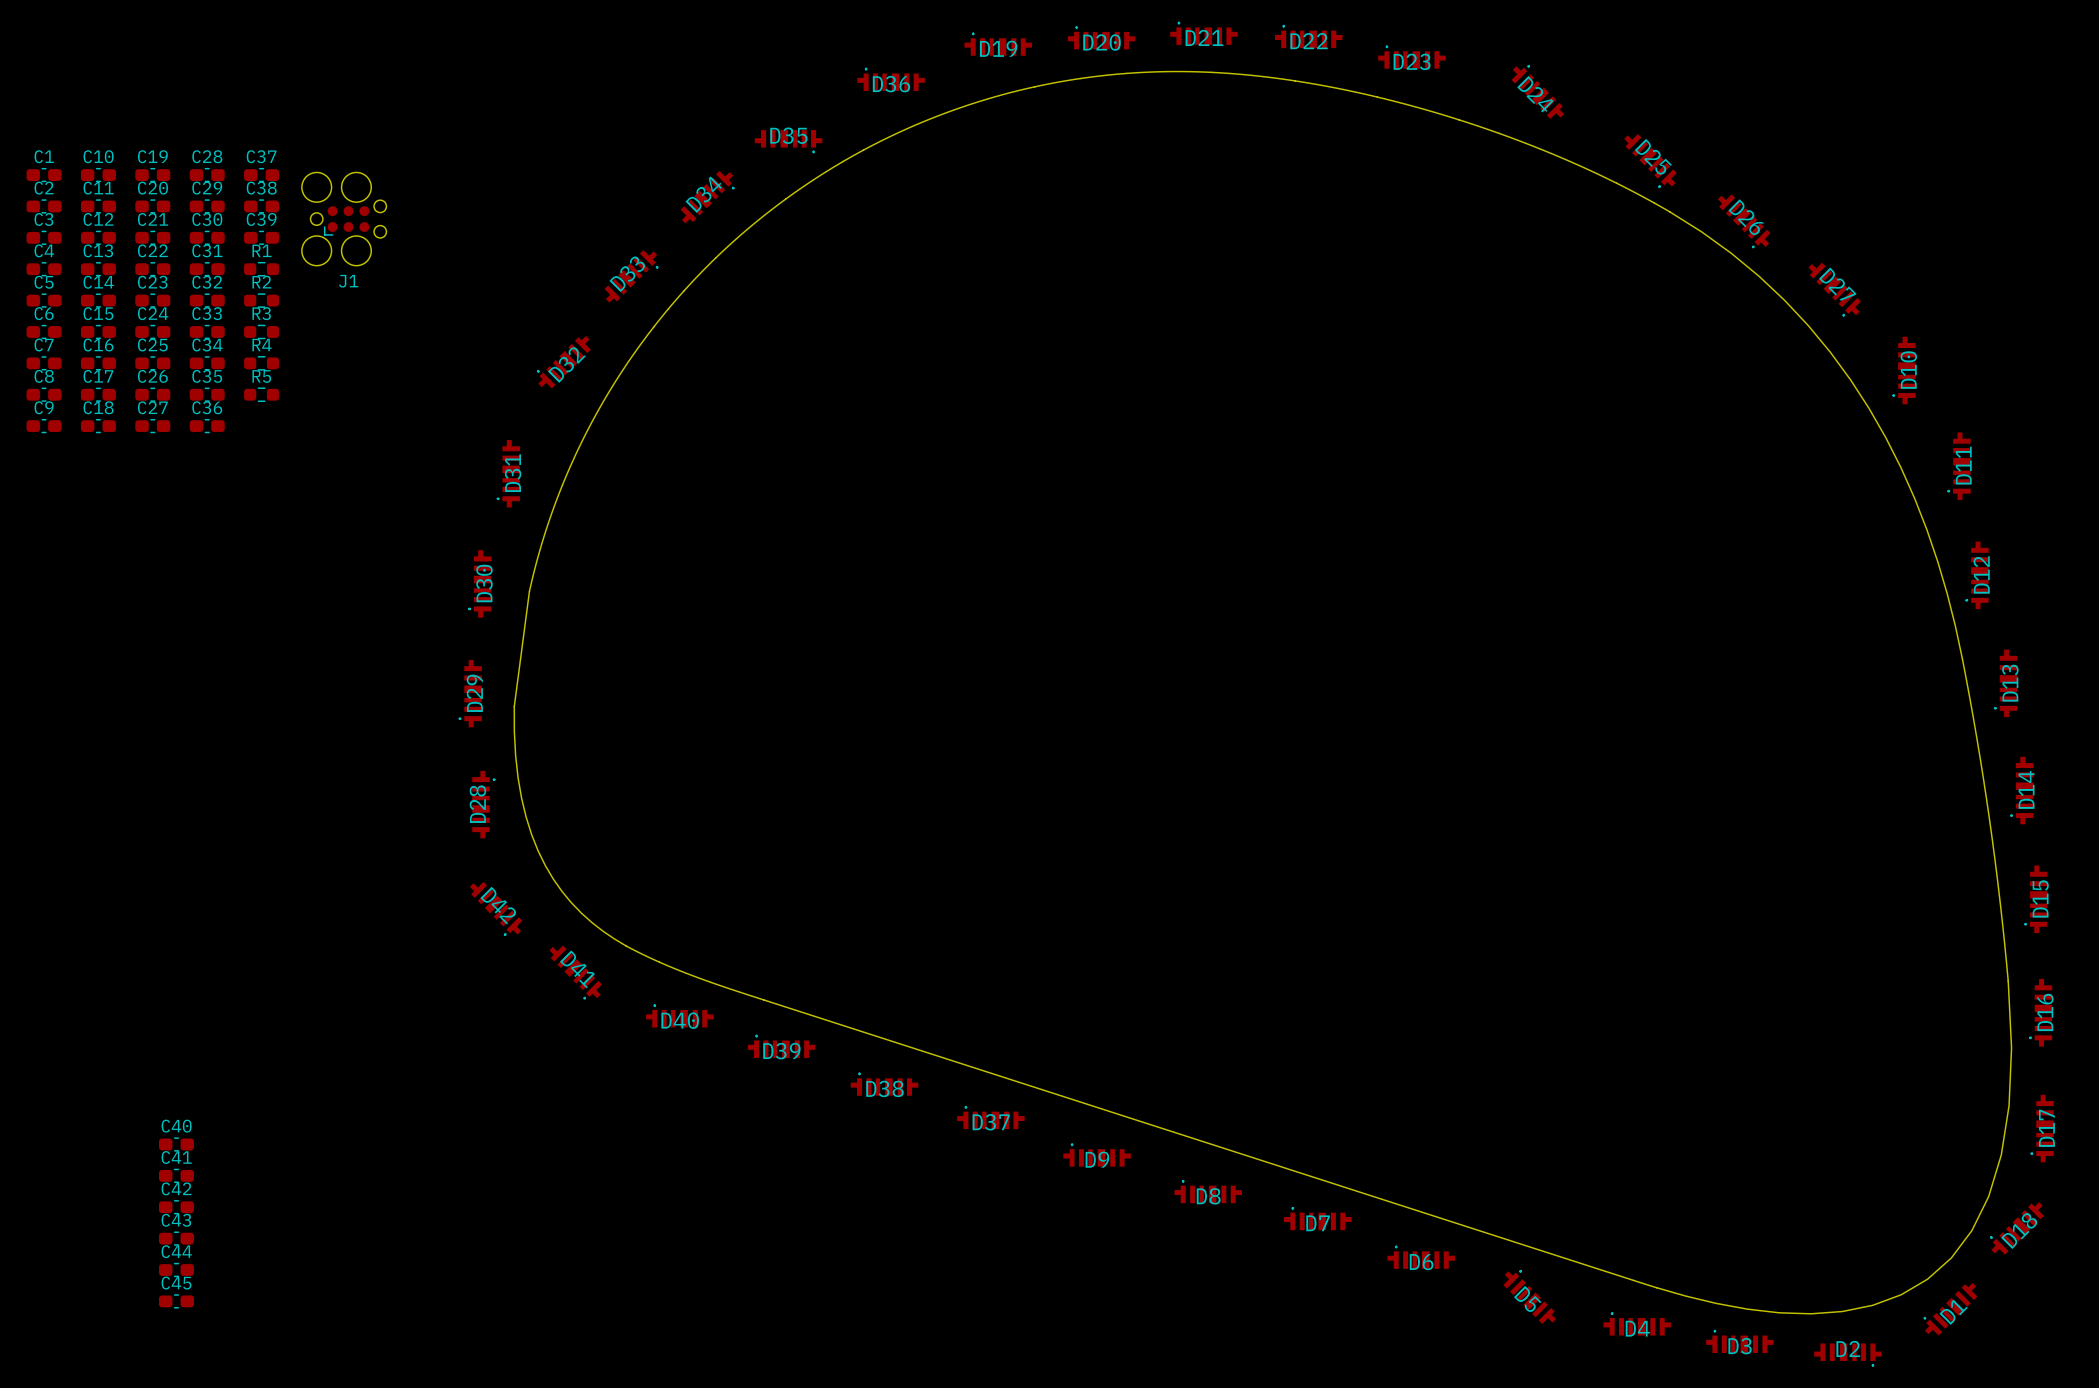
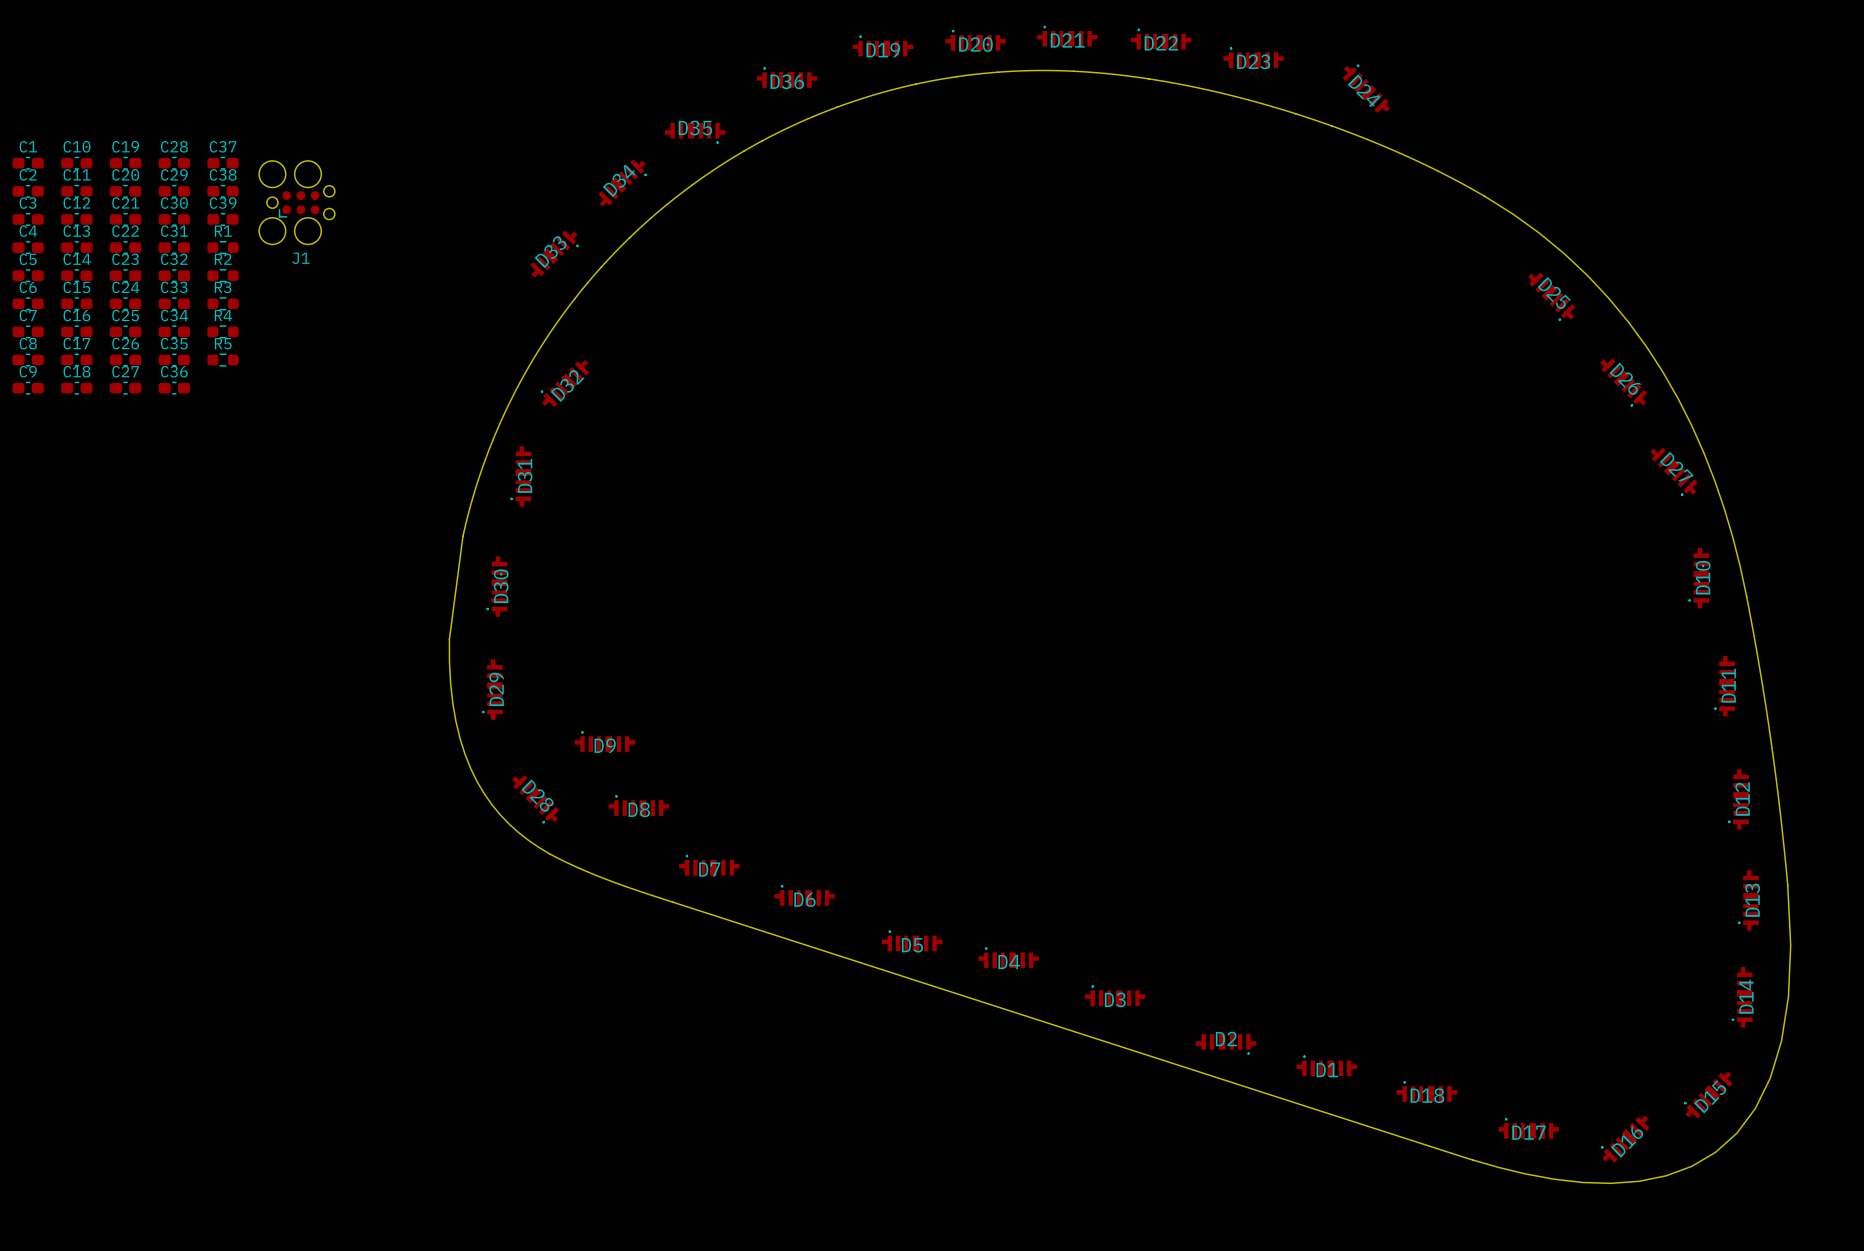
D25 position: (1650, 160) -> (1551, 296)
D26 position: (1744, 221) -> (1623, 382)
D27 position: (1834, 289) -> (1674, 471)
D32 position: (563, 362) -> (565, 383)
D10 position: (1904, 370) -> (1698, 578)
D11 position: (1959, 466) -> (1724, 686)
D31 position: (508, 473) -> (520, 476)
D12 position: (1977, 575) -> (1738, 799)
D30 position: (479, 583) -> (496, 586)
D13 position: (2005, 683) -> (1748, 900)
D29 position: (470, 693) -> (492, 689)
D14 position: (2021, 790) -> (1742, 997)
D28 rotation: 0° (483, 804) -> 135° clockwise (535, 799)
D28 position: (483, 804) -> (535, 799)
D15 rotation: 0° (2035, 899) -> 45° clockwise (1708, 1095)
D15 position: (2035, 899) -> (1708, 1095)
D42: (496, 908) -> none
D41: (575, 972) -> none
D16 rotation: 0° (2040, 1012) -> 45° clockwise (1625, 1139)
D16 position: (2040, 1012) -> (1625, 1139)
D40: (679, 1015) -> none
D39: (781, 1046) -> none
D38: (884, 1084) -> none
D37: (990, 1117) -> none
D17 rotation: 0° (2042, 1128) -> 90° clockwise (1528, 1128)
D17 position: (2042, 1128) -> (1528, 1128)
C40: (176, 1144) -> none
D9 position: (1097, 1155) -> (604, 741)
C41: (176, 1175) -> none
D8 position: (1208, 1191) -> (638, 805)
C42: (176, 1207) -> none
D7 position: (1317, 1218) -> (709, 865)
D18 rotation: 0° (2017, 1228) -> 45° clockwise (1427, 1091)
D18 position: (2017, 1228) -> (1427, 1091)
C43: (176, 1238) -> none
D6 position: (1421, 1257) -> (804, 895)
C44: (176, 1270) -> none
D5 rotation: 0° (1529, 1296) -> 45° counterclockwise (912, 940)
D5 position: (1529, 1296) -> (912, 940)
C45: (176, 1301) -> none
D1 rotation: 0° (1950, 1309) -> 45° clockwise (1326, 1065)
D1 position: (1950, 1309) -> (1326, 1065)
D4 position: (1637, 1323) -> (1008, 957)
D3 position: (1739, 1341) -> (1115, 995)
D2 position: (1847, 1355) -> (1226, 1044)

